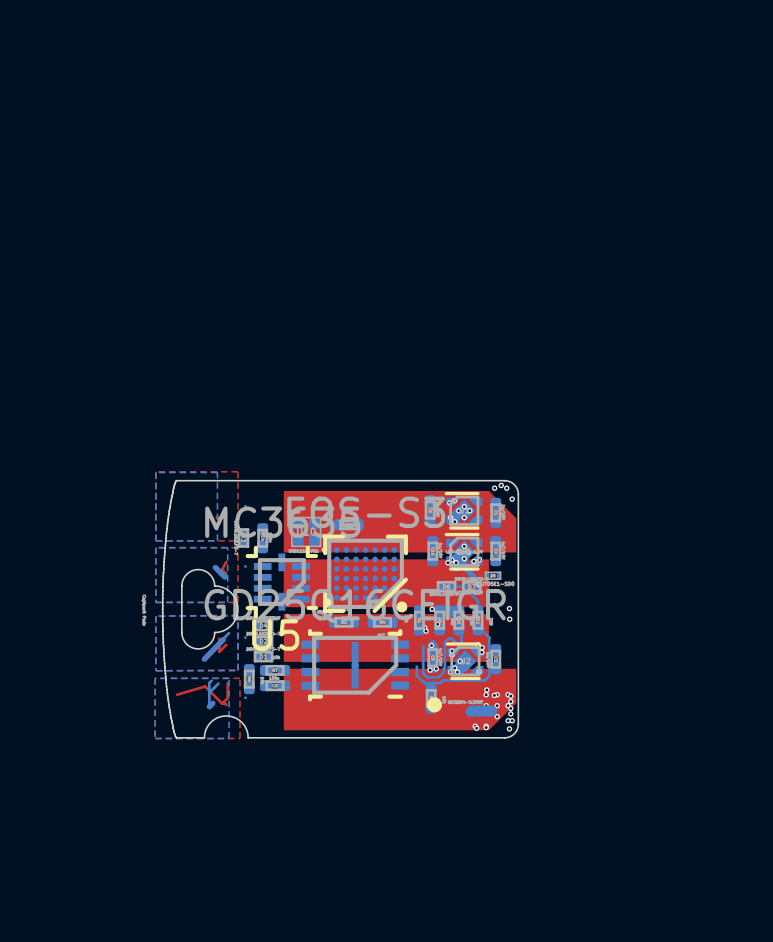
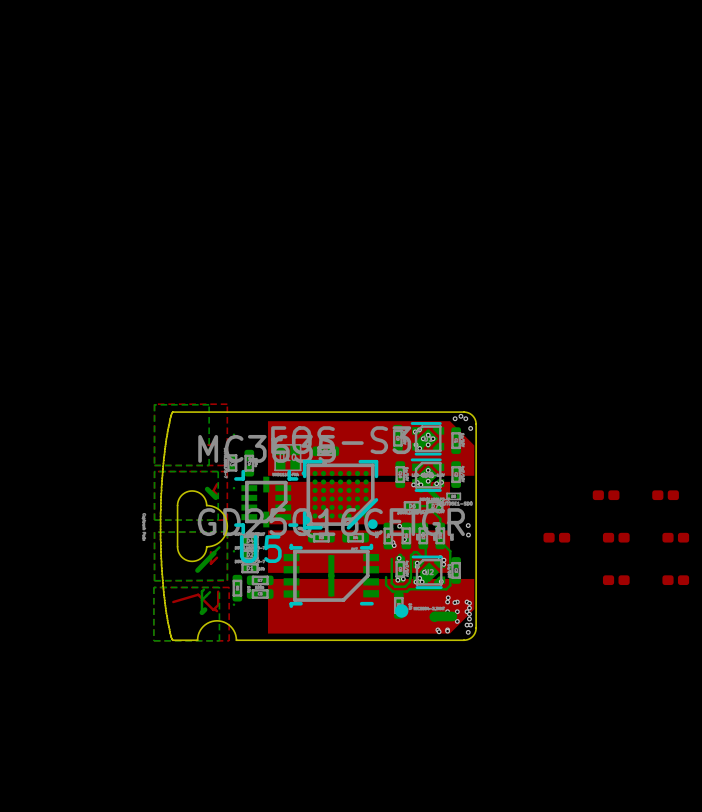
part: none -> (606, 495)
part: none -> (665, 495)
part: none -> (556, 537)
part: none -> (616, 537)
part: none -> (675, 537)
part: none -> (616, 580)
part: none -> (675, 580)

